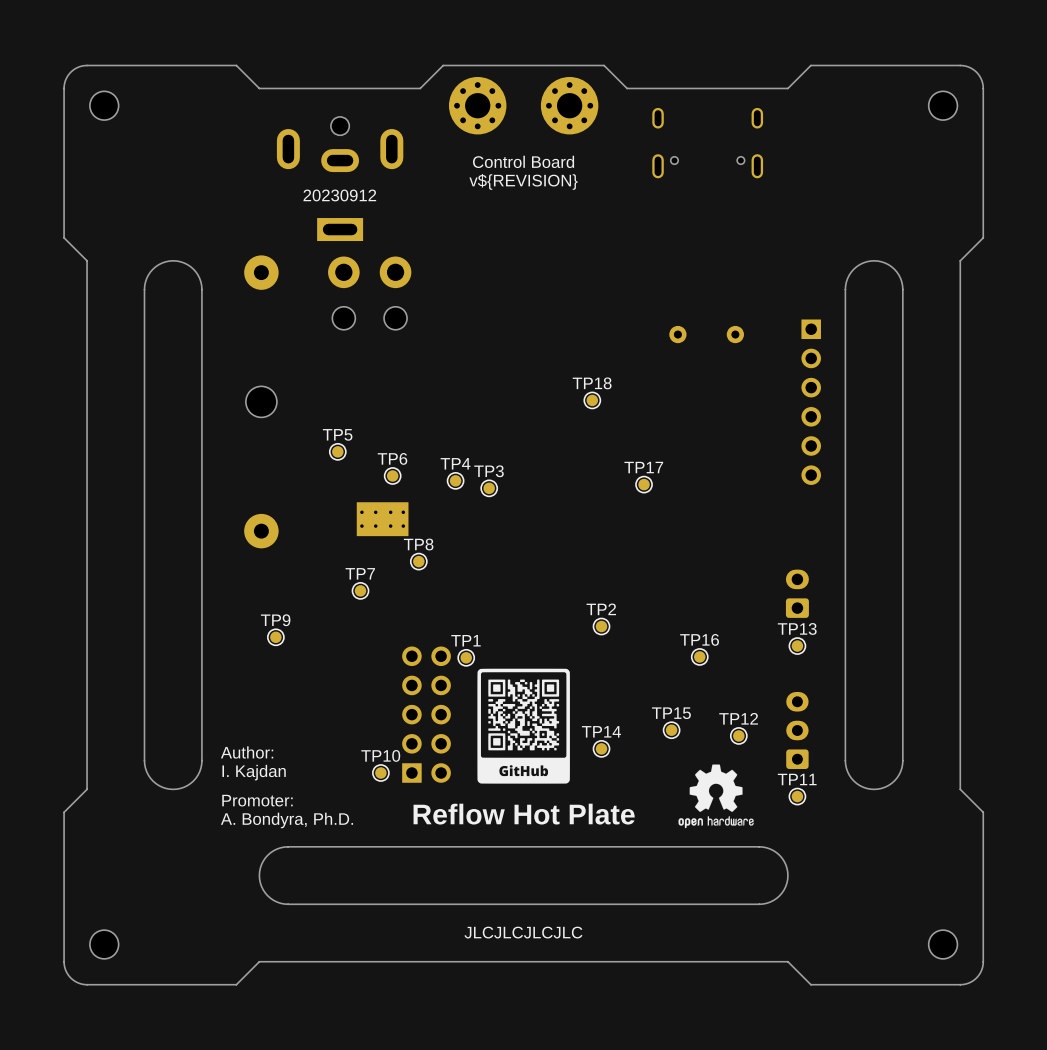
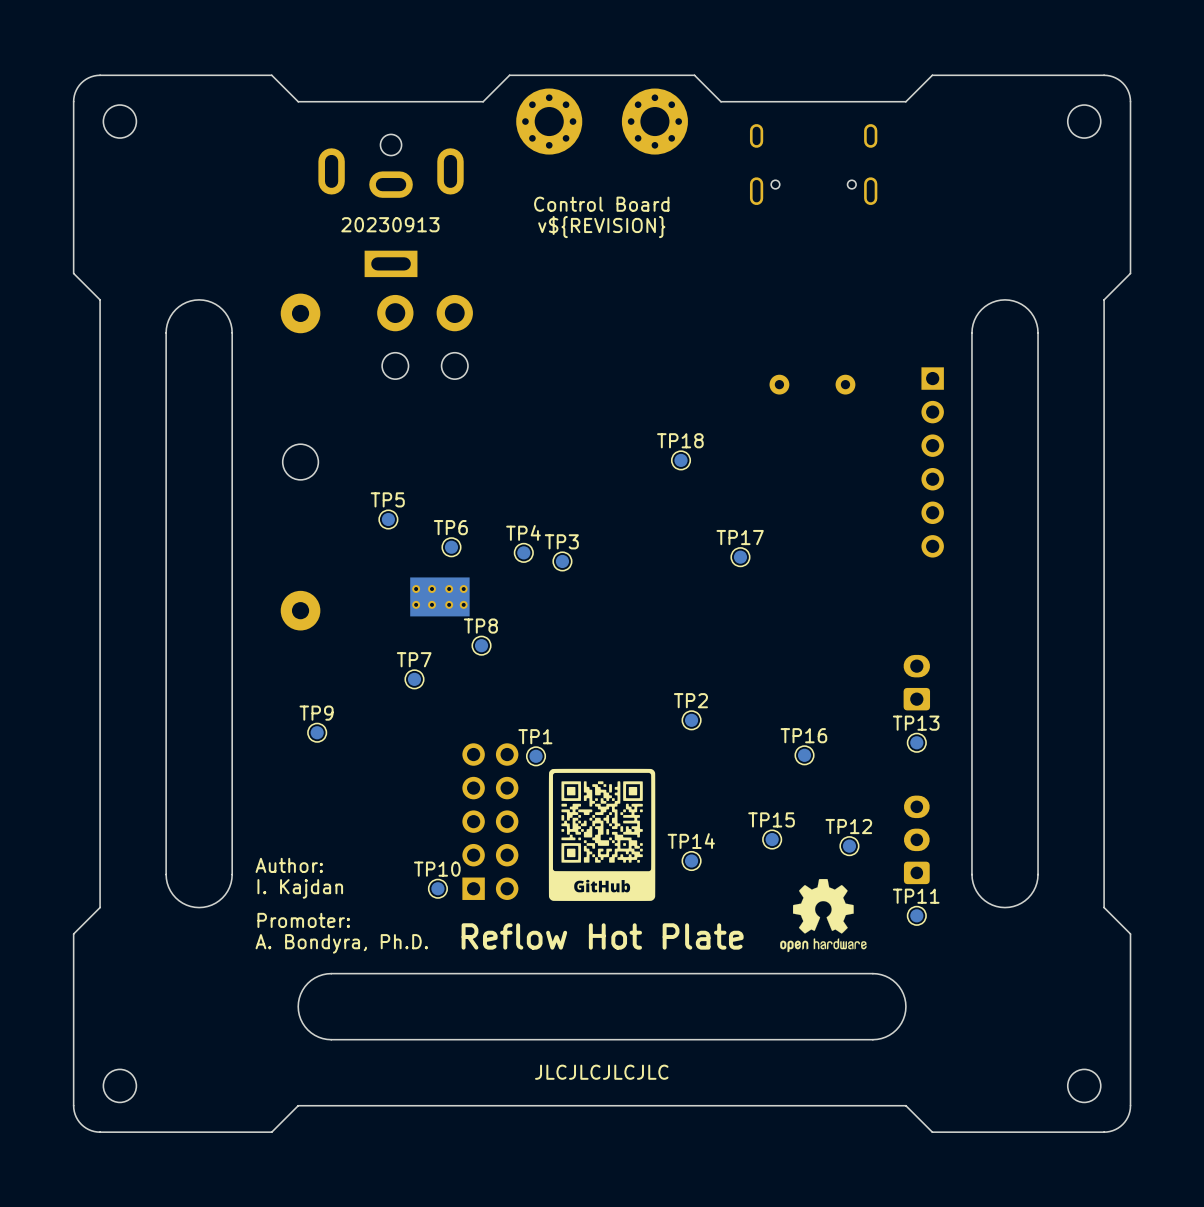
text: Control Board (523, 161) -> none
text: v${REVISION} (523, 181) -> Control Board (601, 204)
text: 20230912 (339, 195) -> 20230913 (390, 224)
text: none -> v${REVISION} (601, 227)

